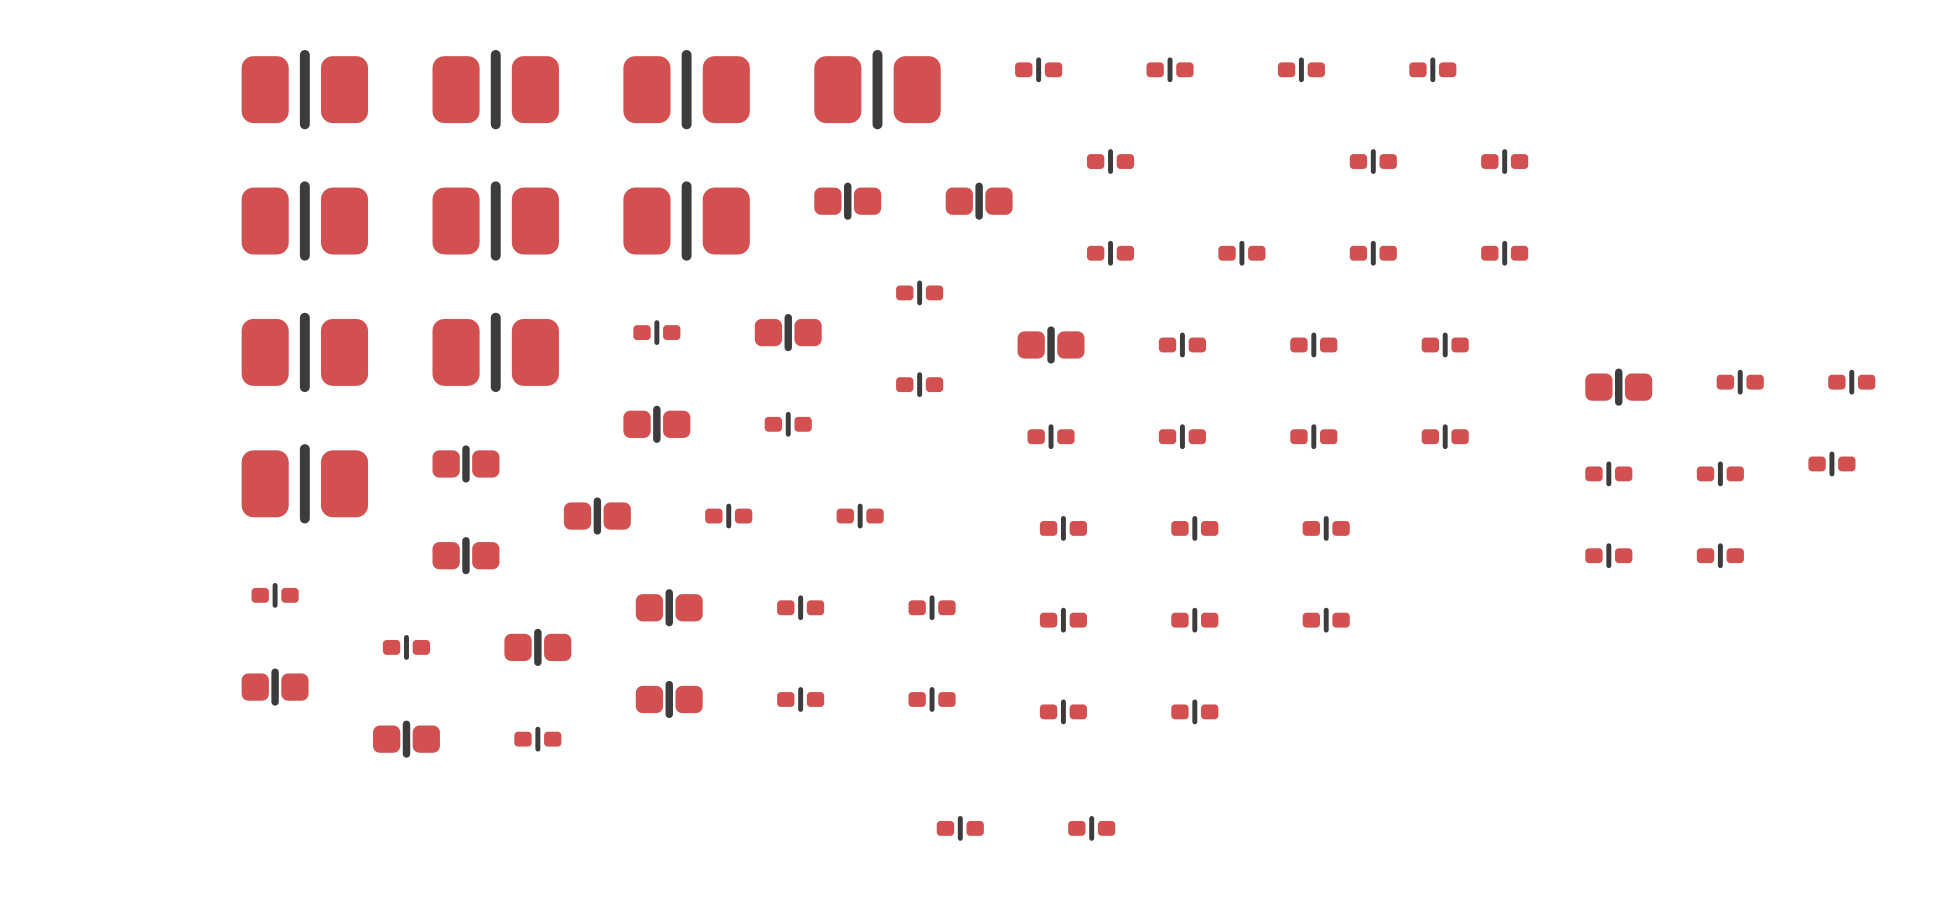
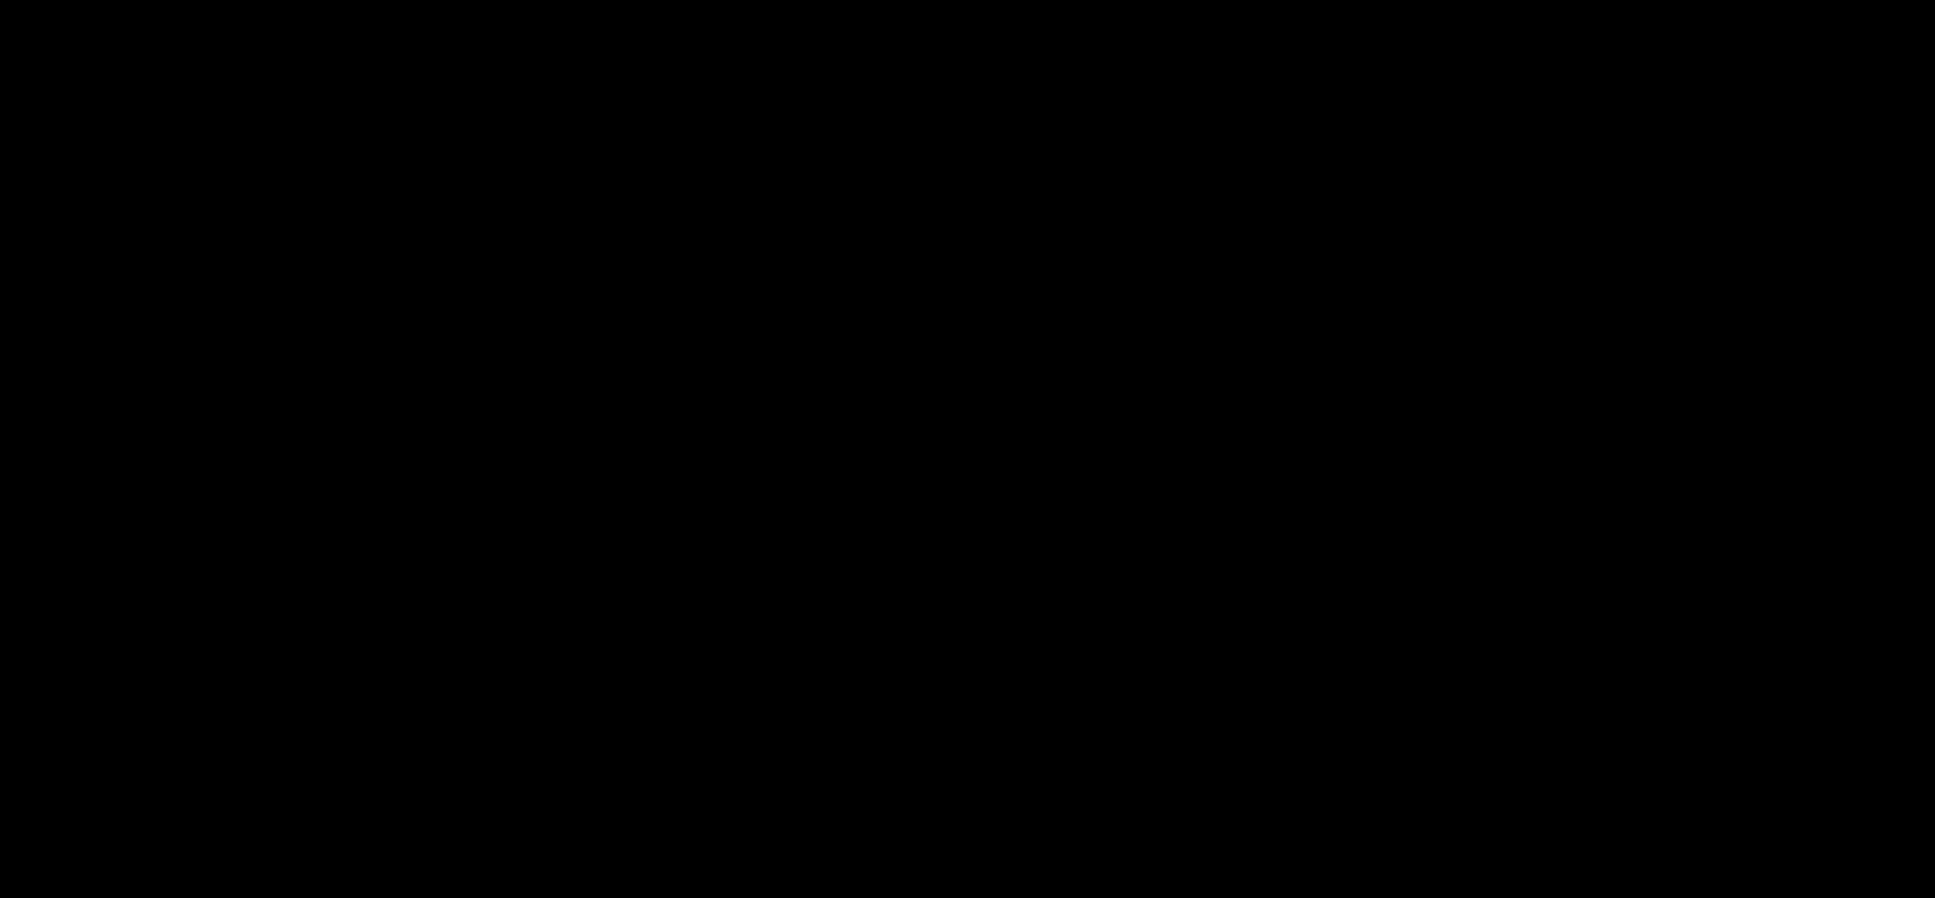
part: (1038, 69) -> none
part: (1170, 69) -> none
part: (1301, 69) -> none
part: (1432, 69) -> none
part: (304, 89) -> none
part: (495, 89) -> none
part: (686, 89) -> none
part: (877, 89) -> none
part: (1110, 161) -> none
part: (1373, 161) -> none
part: (1504, 161) -> none
part: (847, 201) -> none
part: (979, 201) -> none
part: (304, 221) -> none
part: (495, 221) -> none
part: (686, 221) -> none
part: (1110, 253) -> none
part: (1241, 253) -> none
part: (1373, 253) -> none
part: (1504, 253) -> none
part: (919, 292) -> none
part: (656, 332) -> none
part: (788, 332) -> none
part: (1051, 344) -> none
part: (1182, 344) -> none
part: (1313, 344) -> none
part: (1445, 344) -> none
part: (304, 352) -> none
part: (495, 352) -> none
part: (1740, 382) -> none
part: (1851, 382) -> none
part: (919, 384) -> none
part: (1618, 387) -> none
part: (656, 424) -> none
part: (788, 424) -> none
part: (1051, 436) -> none
part: (1182, 436) -> none
part: (1313, 436) -> none
part: (1445, 436) -> none
part: (465, 463) -> none
part: (1831, 463) -> none
part: (1608, 473) -> none
part: (1720, 473) -> none
part: (304, 483) -> none
part: (597, 516) -> none
part: (728, 516) -> none
part: (860, 516) -> none
part: (1063, 528) -> none
part: (1194, 528) -> none
part: (1326, 528) -> none
part: (465, 555) -> none
part: (1608, 555) -> none
part: (1720, 555) -> none
part: (275, 595) -> none
part: (669, 607) -> none
part: (800, 607) -> none
part: (932, 607) -> none
part: (1063, 620) -> none
part: (1194, 620) -> none
part: (1326, 620) -> none
part: (406, 647) -> none
part: (537, 647) -> none
part: (275, 687) -> none
part: (669, 699) -> none
part: (800, 699) -> none
part: (932, 699) -> none
part: (1063, 711) -> none
part: (1194, 711) -> none
part: (406, 739) -> none
part: (537, 739) -> none
part: (960, 828) -> none
part: (1091, 828) -> none

